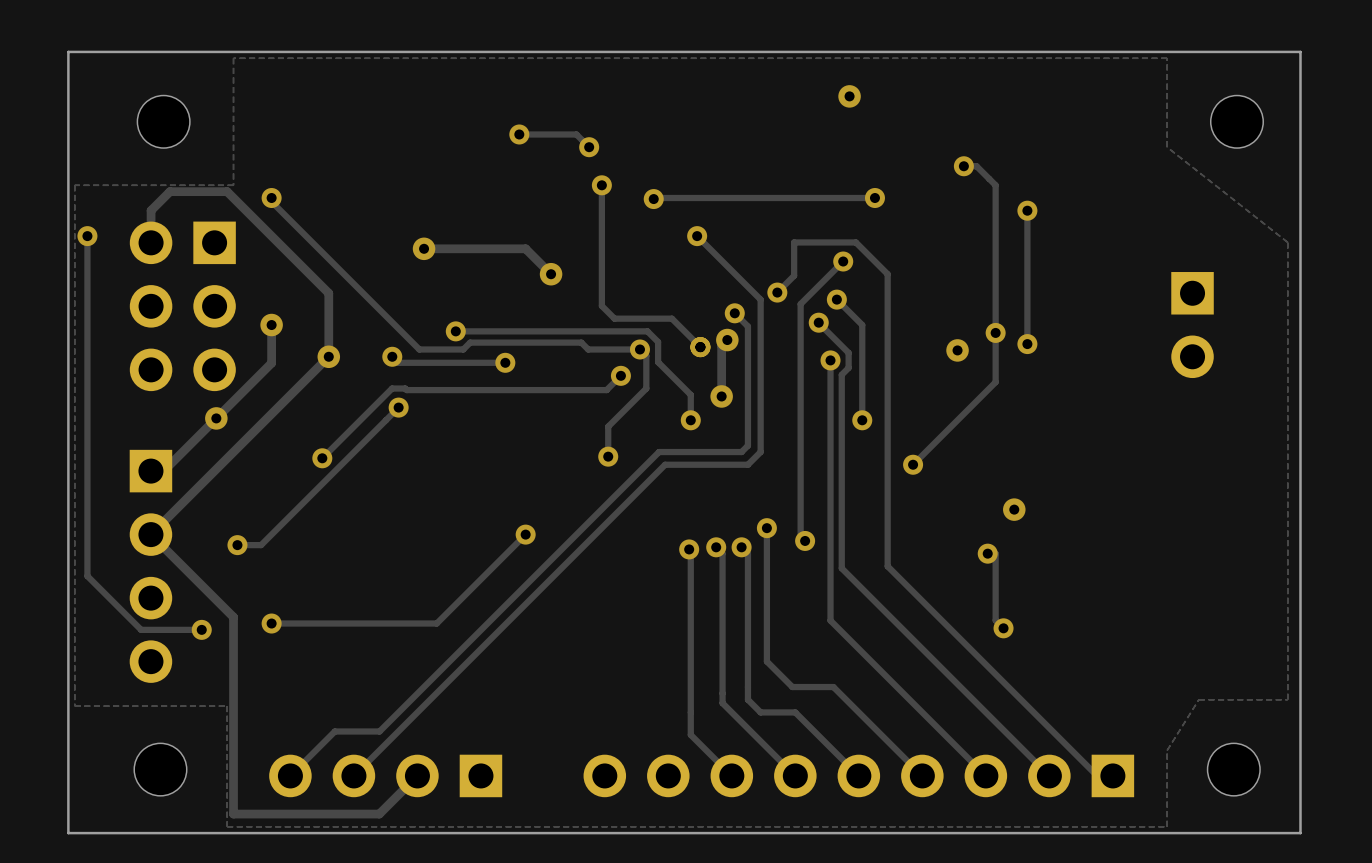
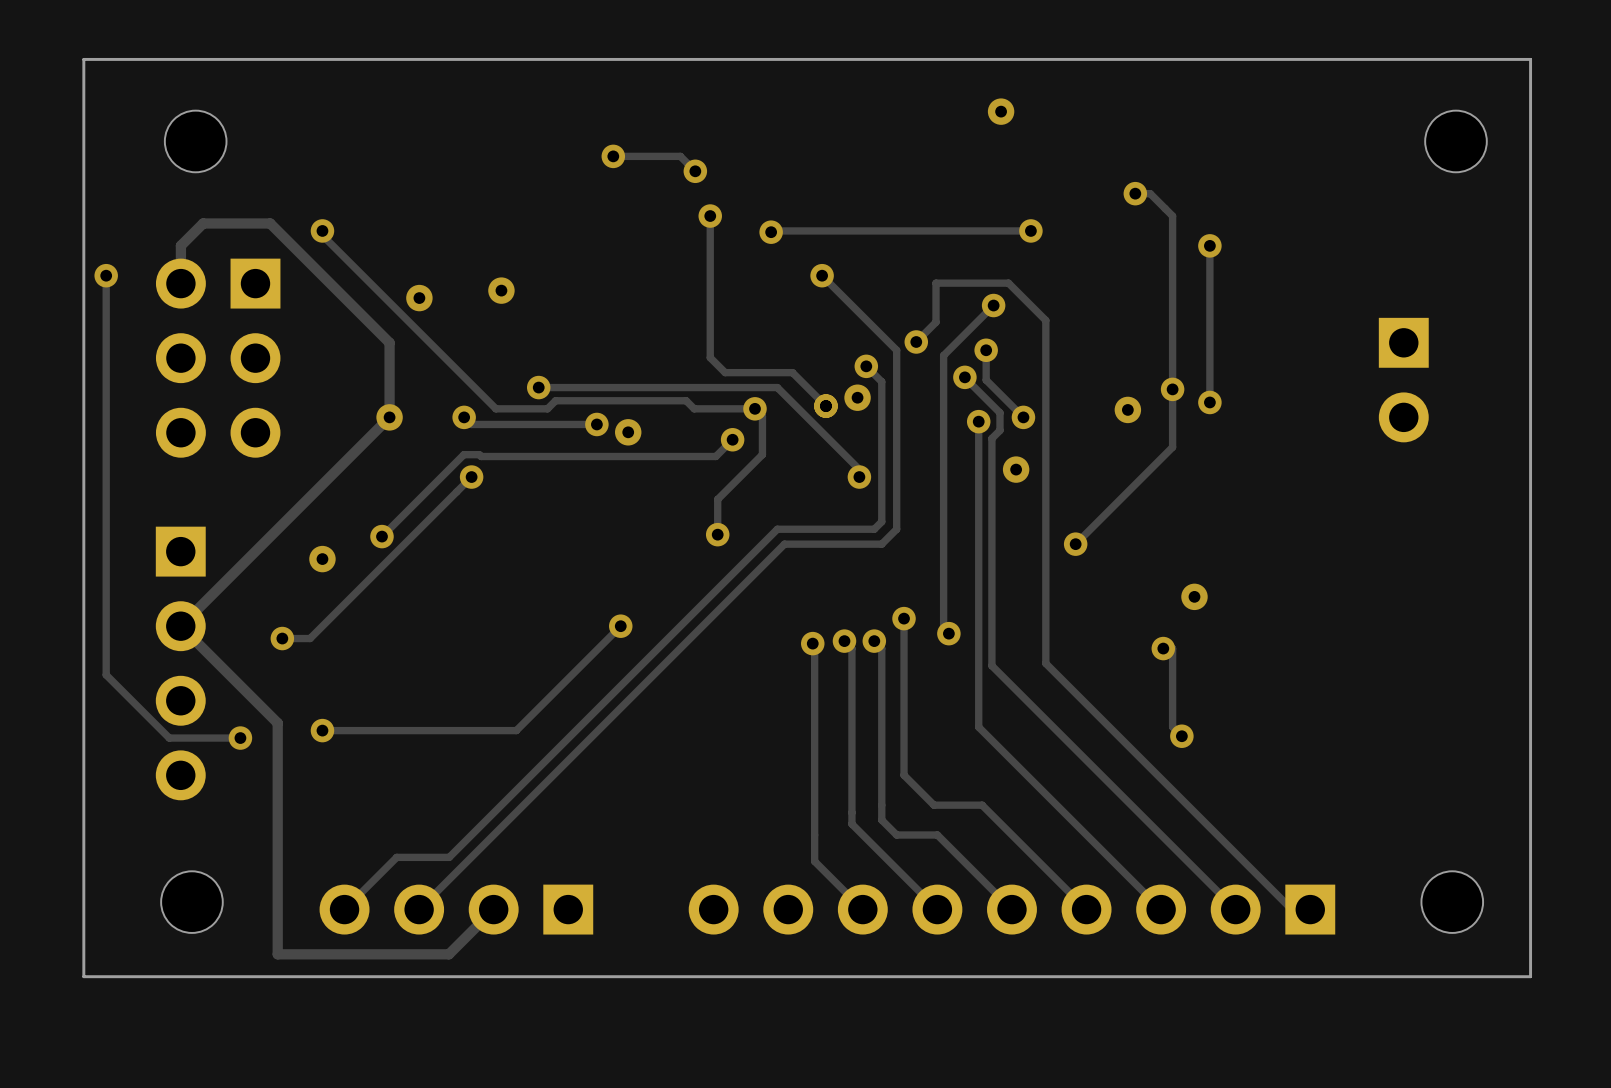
zone outline: (1167, 58) (1167, 147) (1287, 242) (1287, 699) (1198, 699) (1167, 750) (1167, 826) (227, 826) (227, 706) (74, 706) (74, 185) (233, 185) (233, 58) (1167, 58) -> none
track: (424, 248) (525, 248) (551, 274) -> none
via: none -> (419, 298)
via: (551, 274) -> none
track: (836, 299) (862, 325) (862, 420) -> (986, 350) (986, 380) (1023, 417)
track: (271, 325) (271, 363) (163, 471) (150, 471) -> none
via: (271, 325) -> none
track: (647, 331) (658, 341) (658, 362) (690, 394) (690, 420) -> (763, 387) (777, 387) (859, 469) (859, 477)
track: (727, 340) (721, 345) (721, 396) -> none
via: none -> (628, 432)
via: (721, 396) -> none
via: none -> (1016, 469)
via: (216, 418) -> none
via position: (690, 420) -> (859, 477)
via position: (862, 420) -> (1023, 417)
via: none -> (322, 559)

